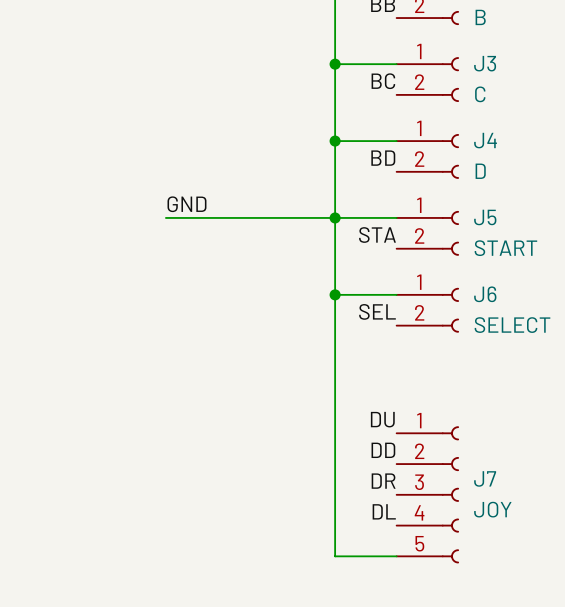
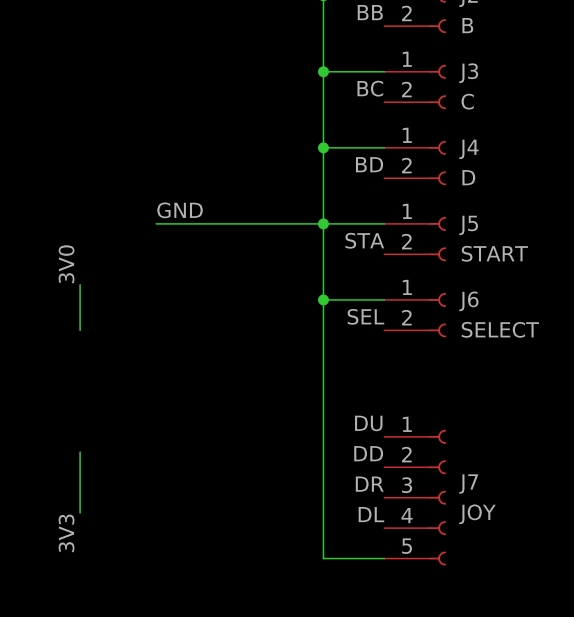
label: none -> 3V0 (66, 264)
wire: none -> (80, 284) (80, 330)
wire: none -> (80, 452) (80, 512)
label: none -> 3V3 (66, 533)

